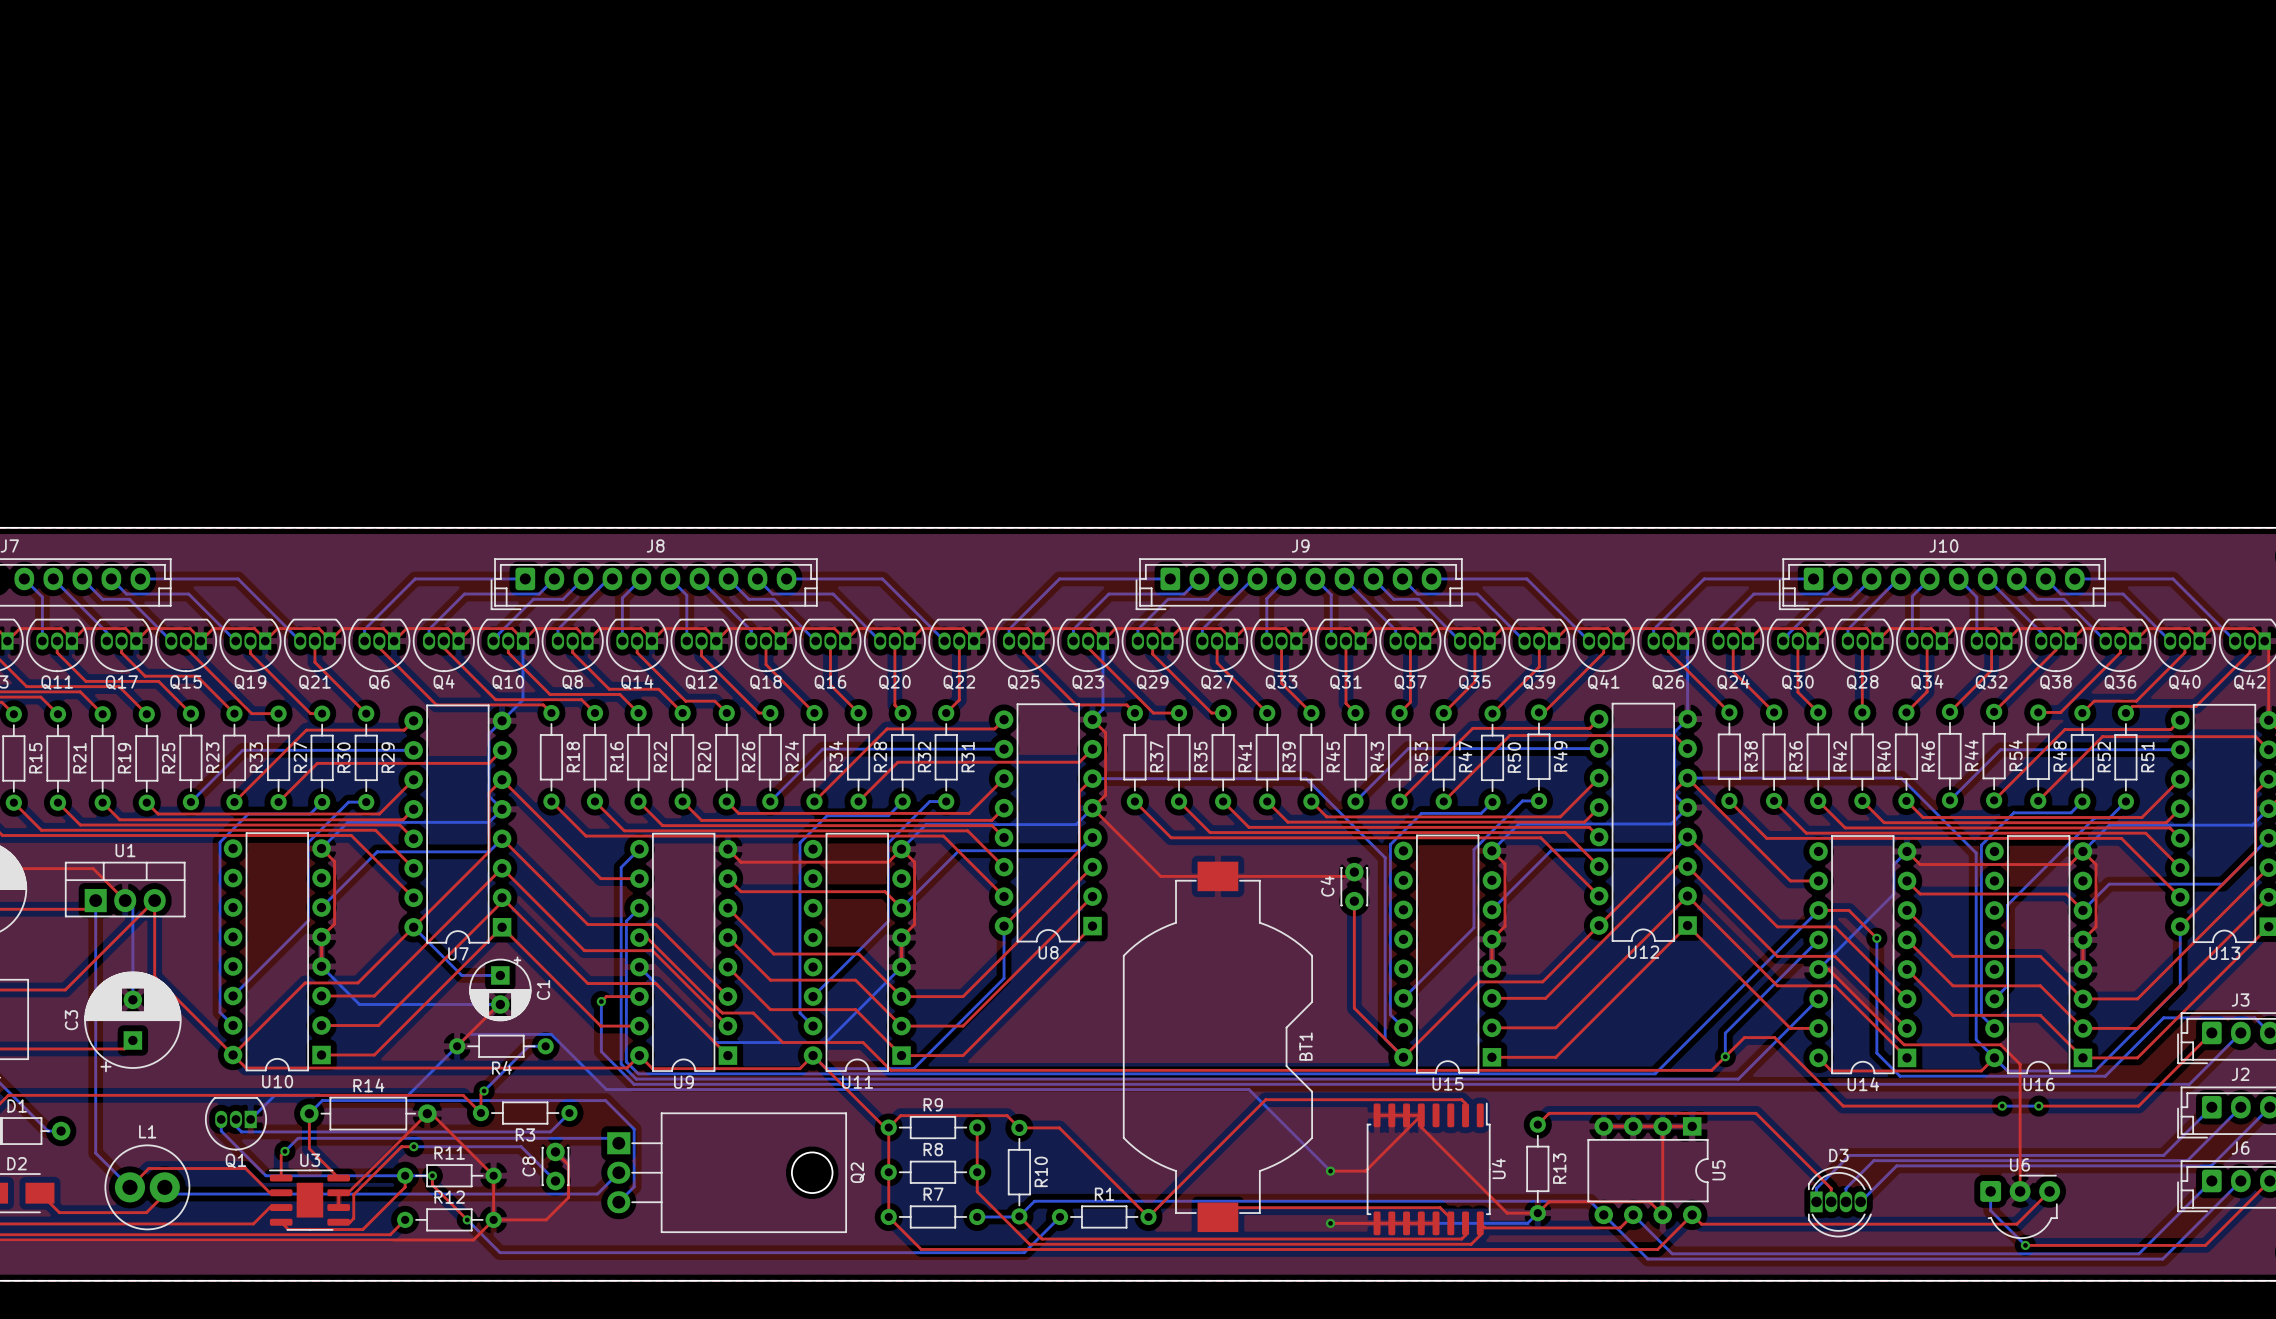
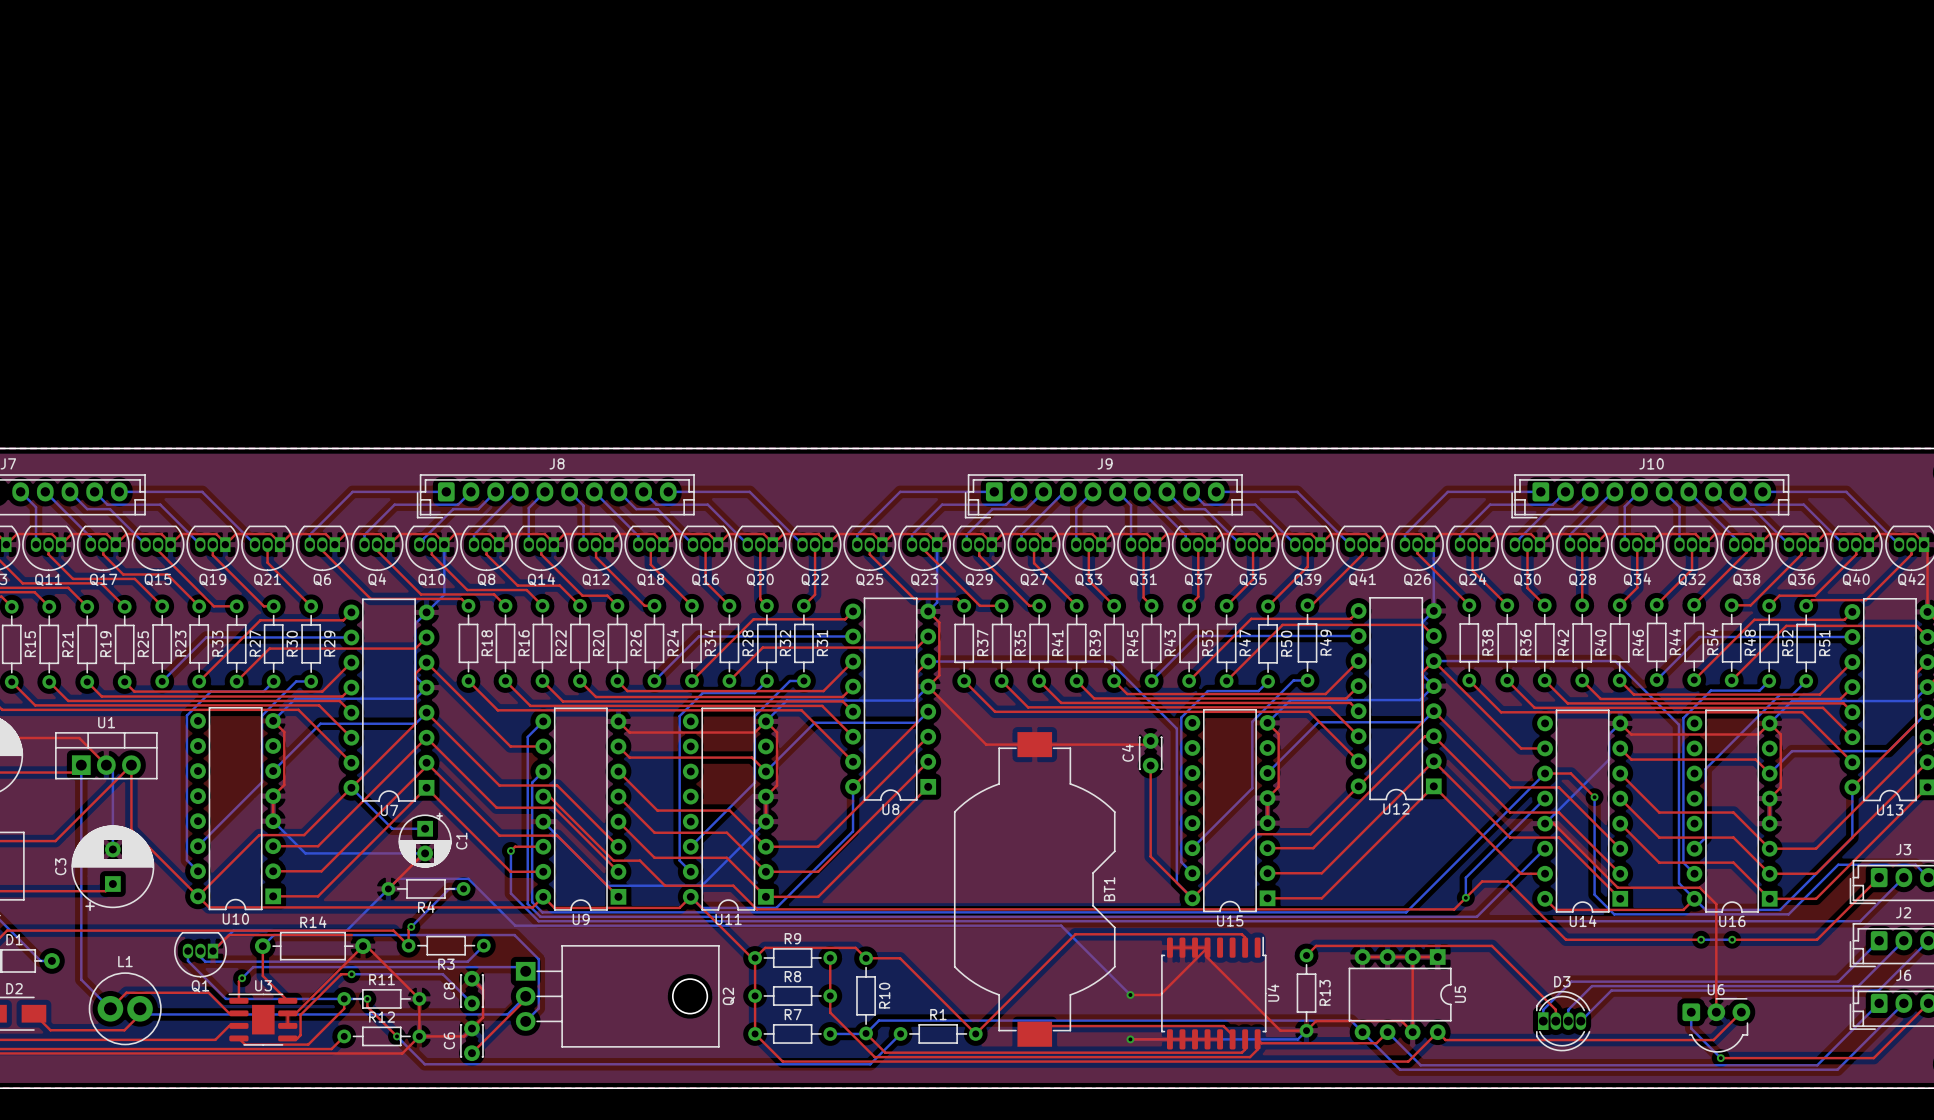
top track: none -> (351, 935) (229, 935) (213, 951)
top track: none -> (525, 999) (471, 1053)
C6: none -> (471, 1040)

